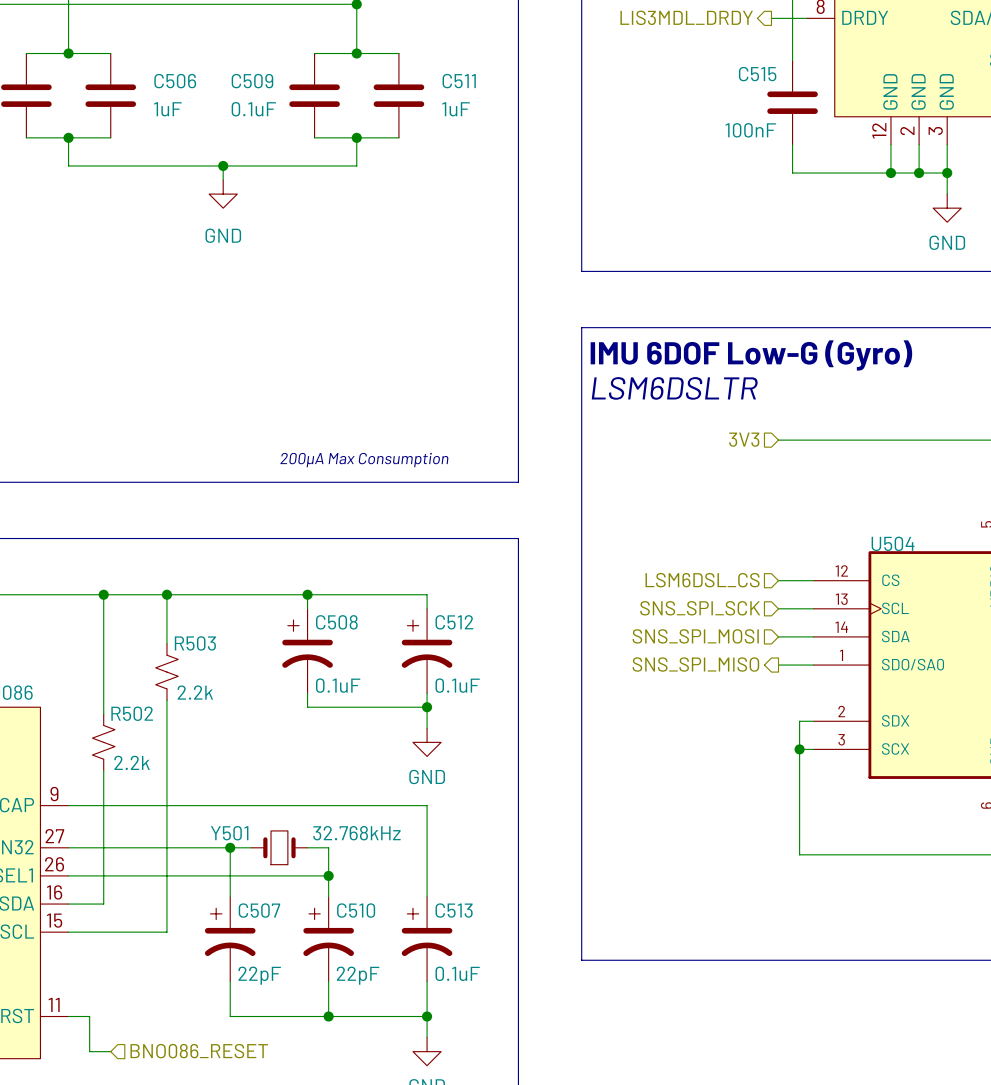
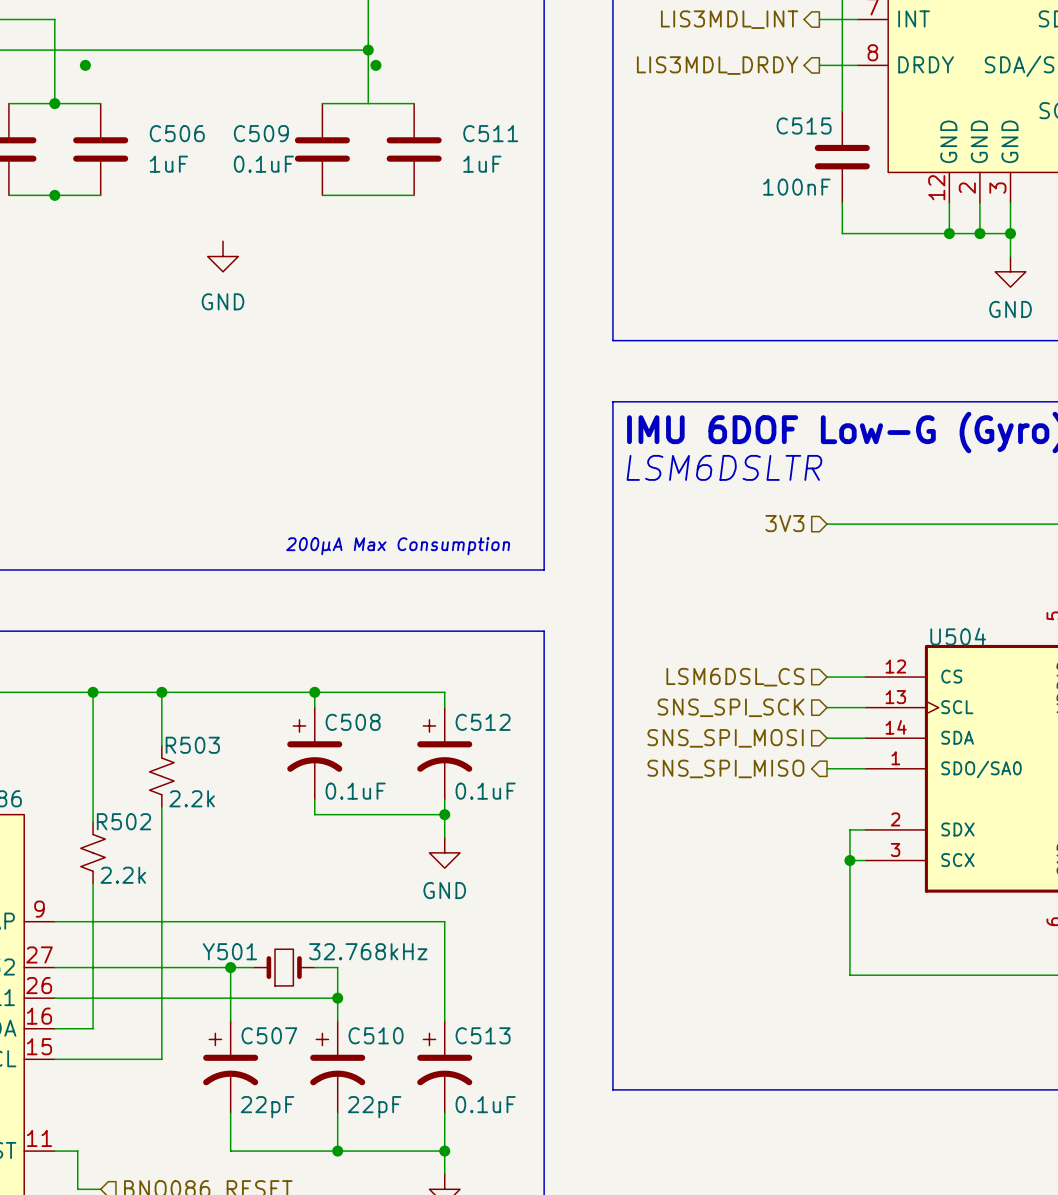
junction: none -> (85, 65)
junction position: (356, 53) -> (375, 65)
wire: (68, 137) (68, 165) (356, 165) (356, 137) -> none
junction: (356, 137) -> none
wire: (223, 165) (223, 180) -> none
junction: (223, 165) -> none

